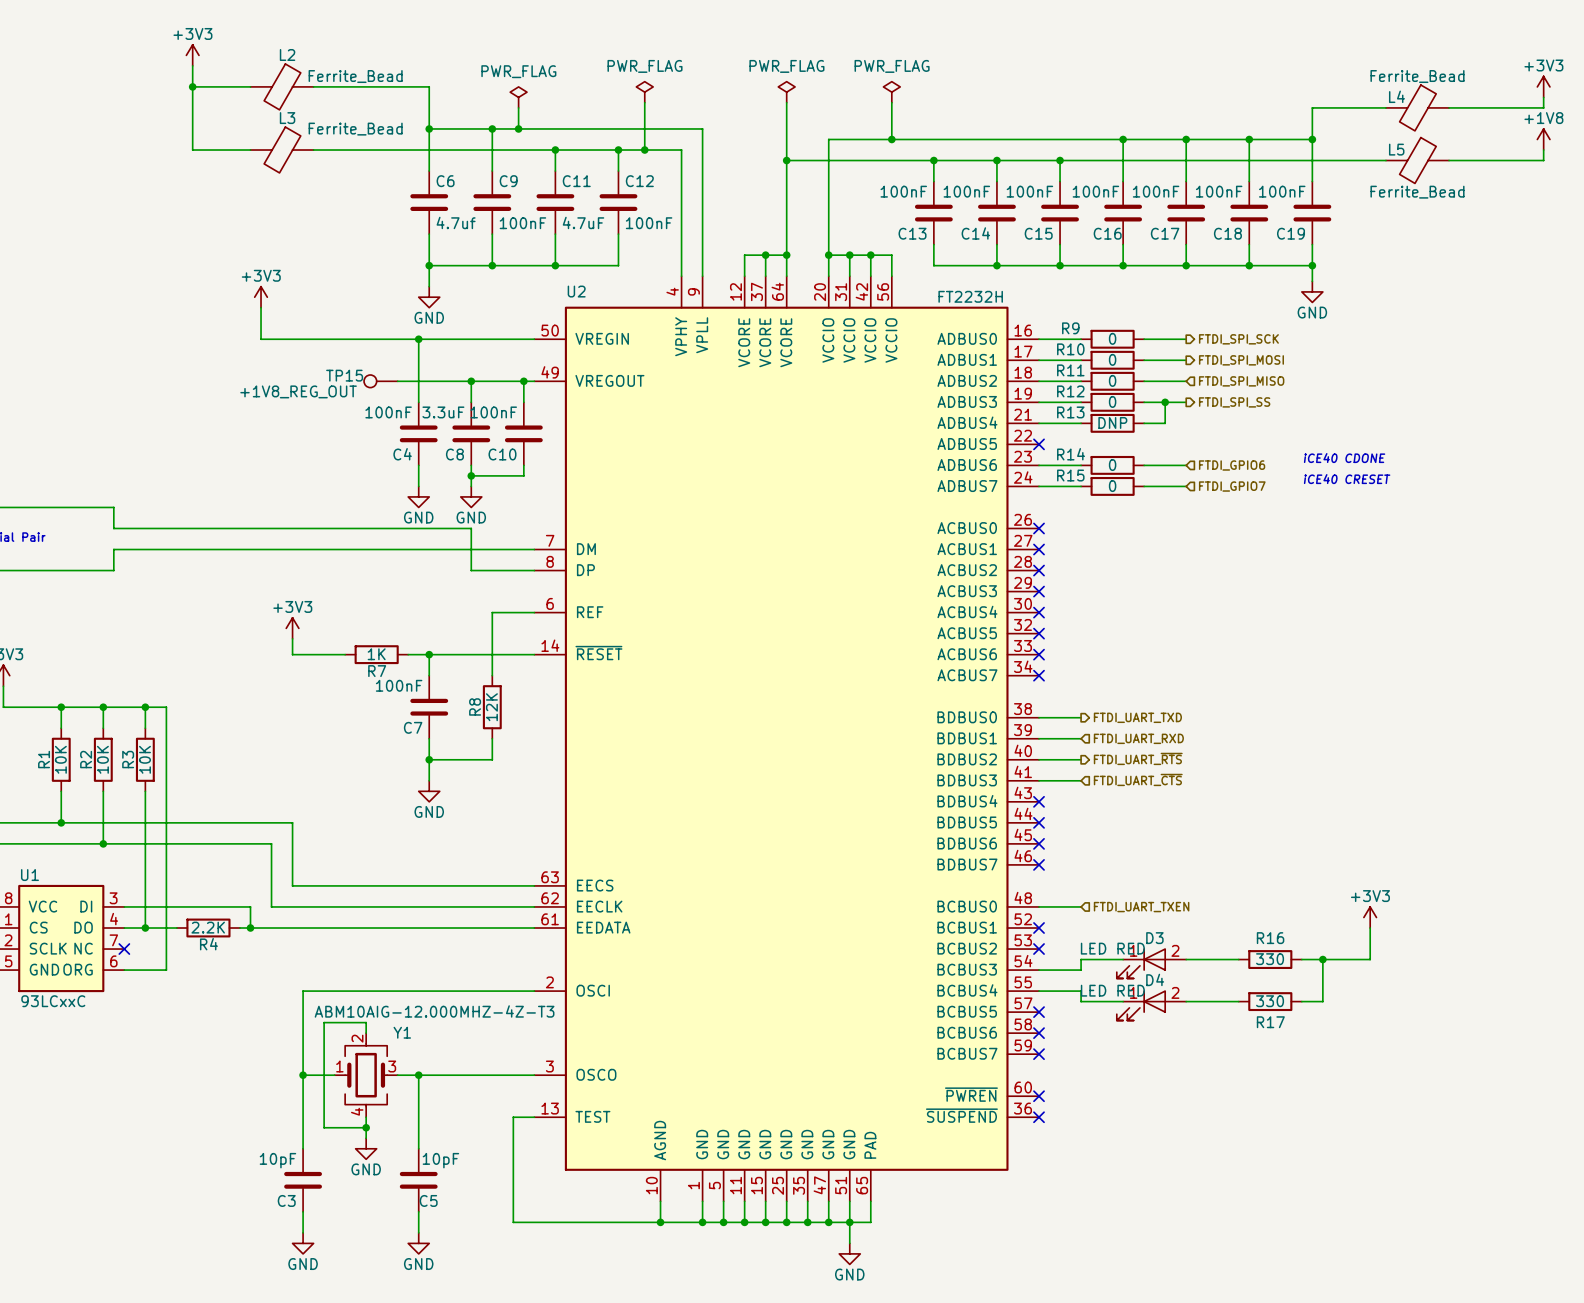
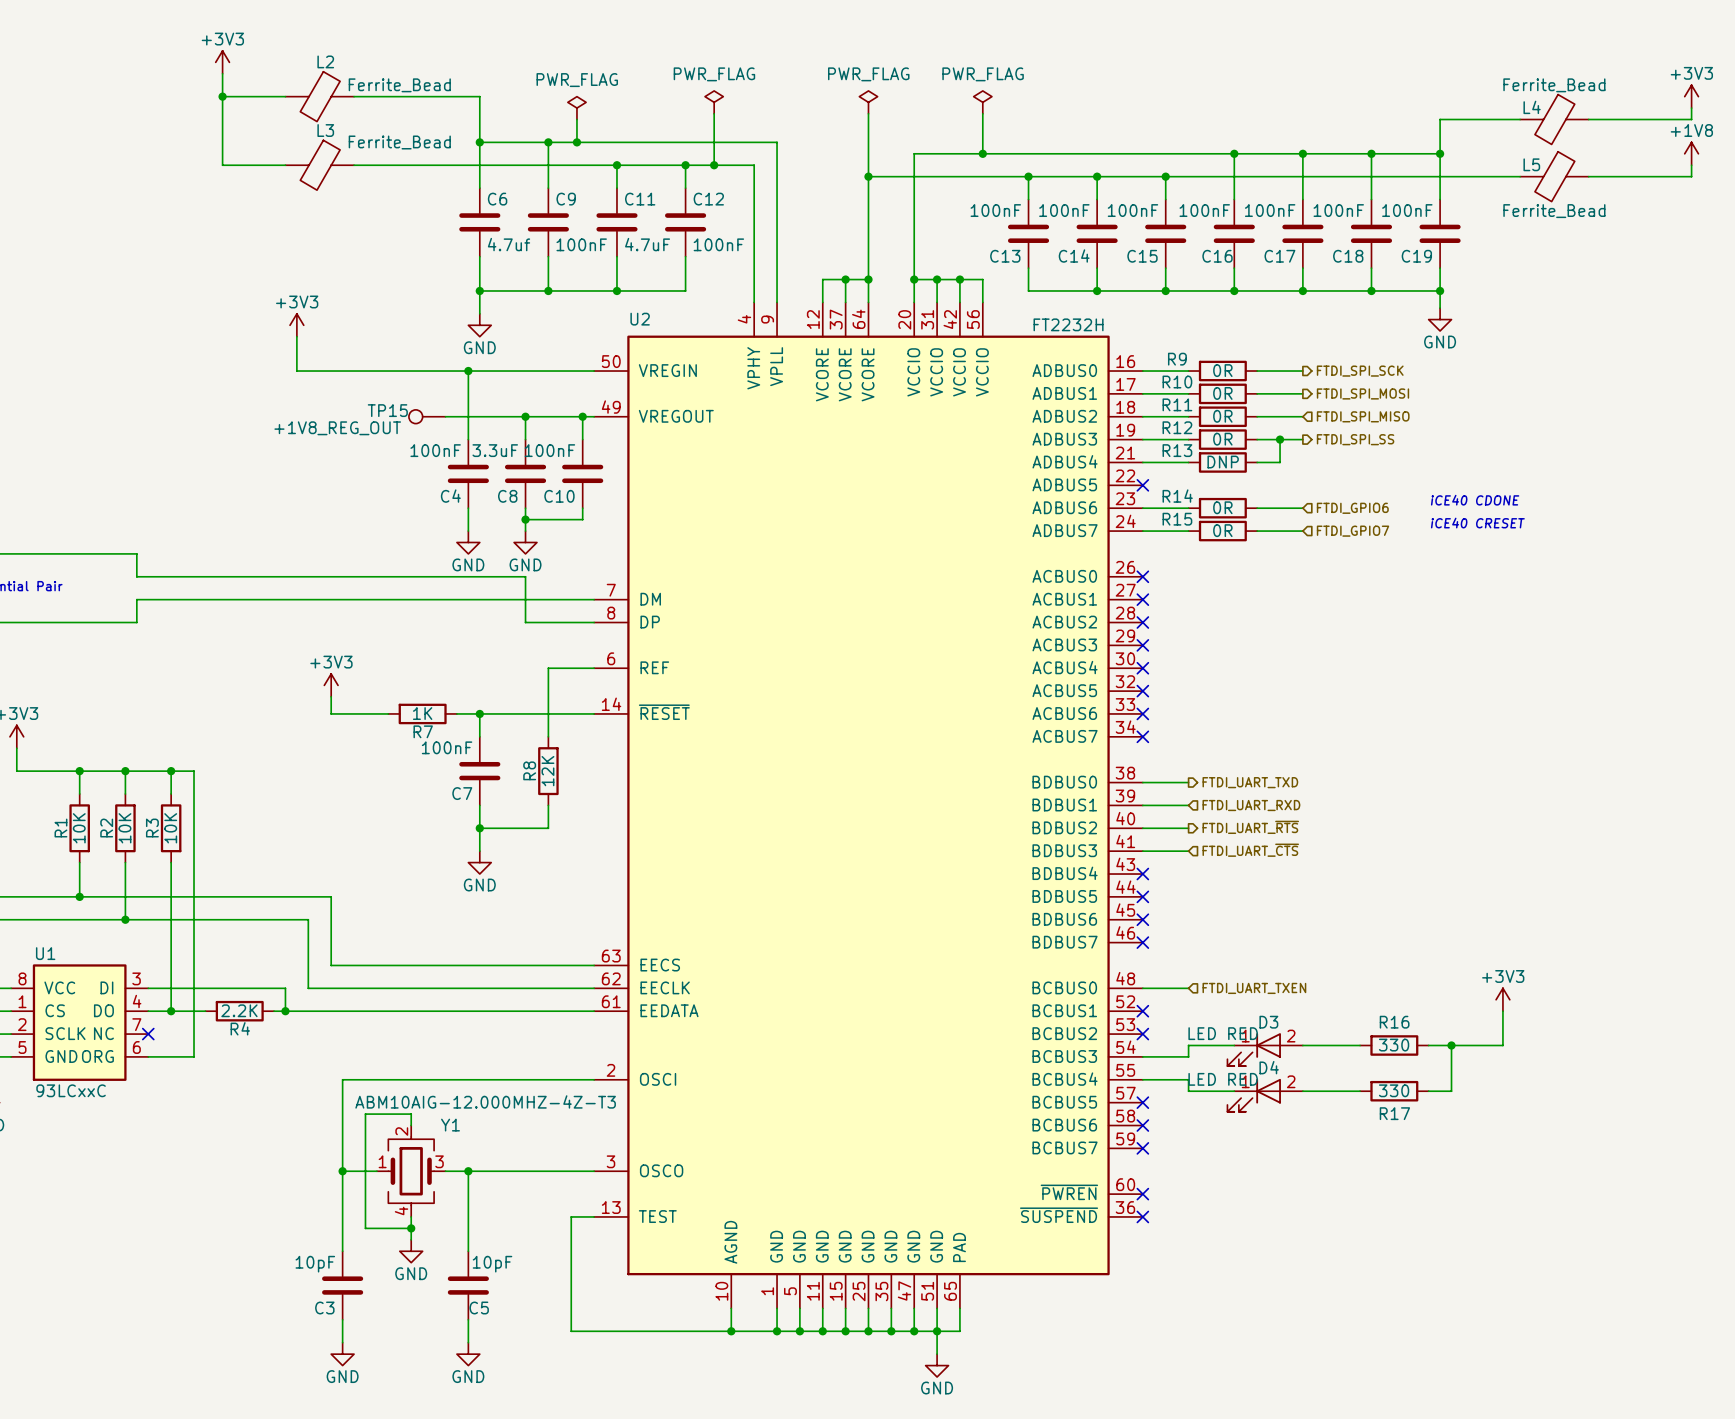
R9 value: 0 (1112, 338) -> 0R (1222, 370)
R10 value: 0 (1112, 359) -> 0R (1222, 393)
R11 value: 0 (1112, 380) -> 0R (1222, 416)
R12 value: 0 (1112, 401) -> 0R (1222, 439)
R14 value: 0 (1112, 465) -> 0R (1222, 507)
R15 value: 0 (1112, 486) -> 0R (1222, 530)

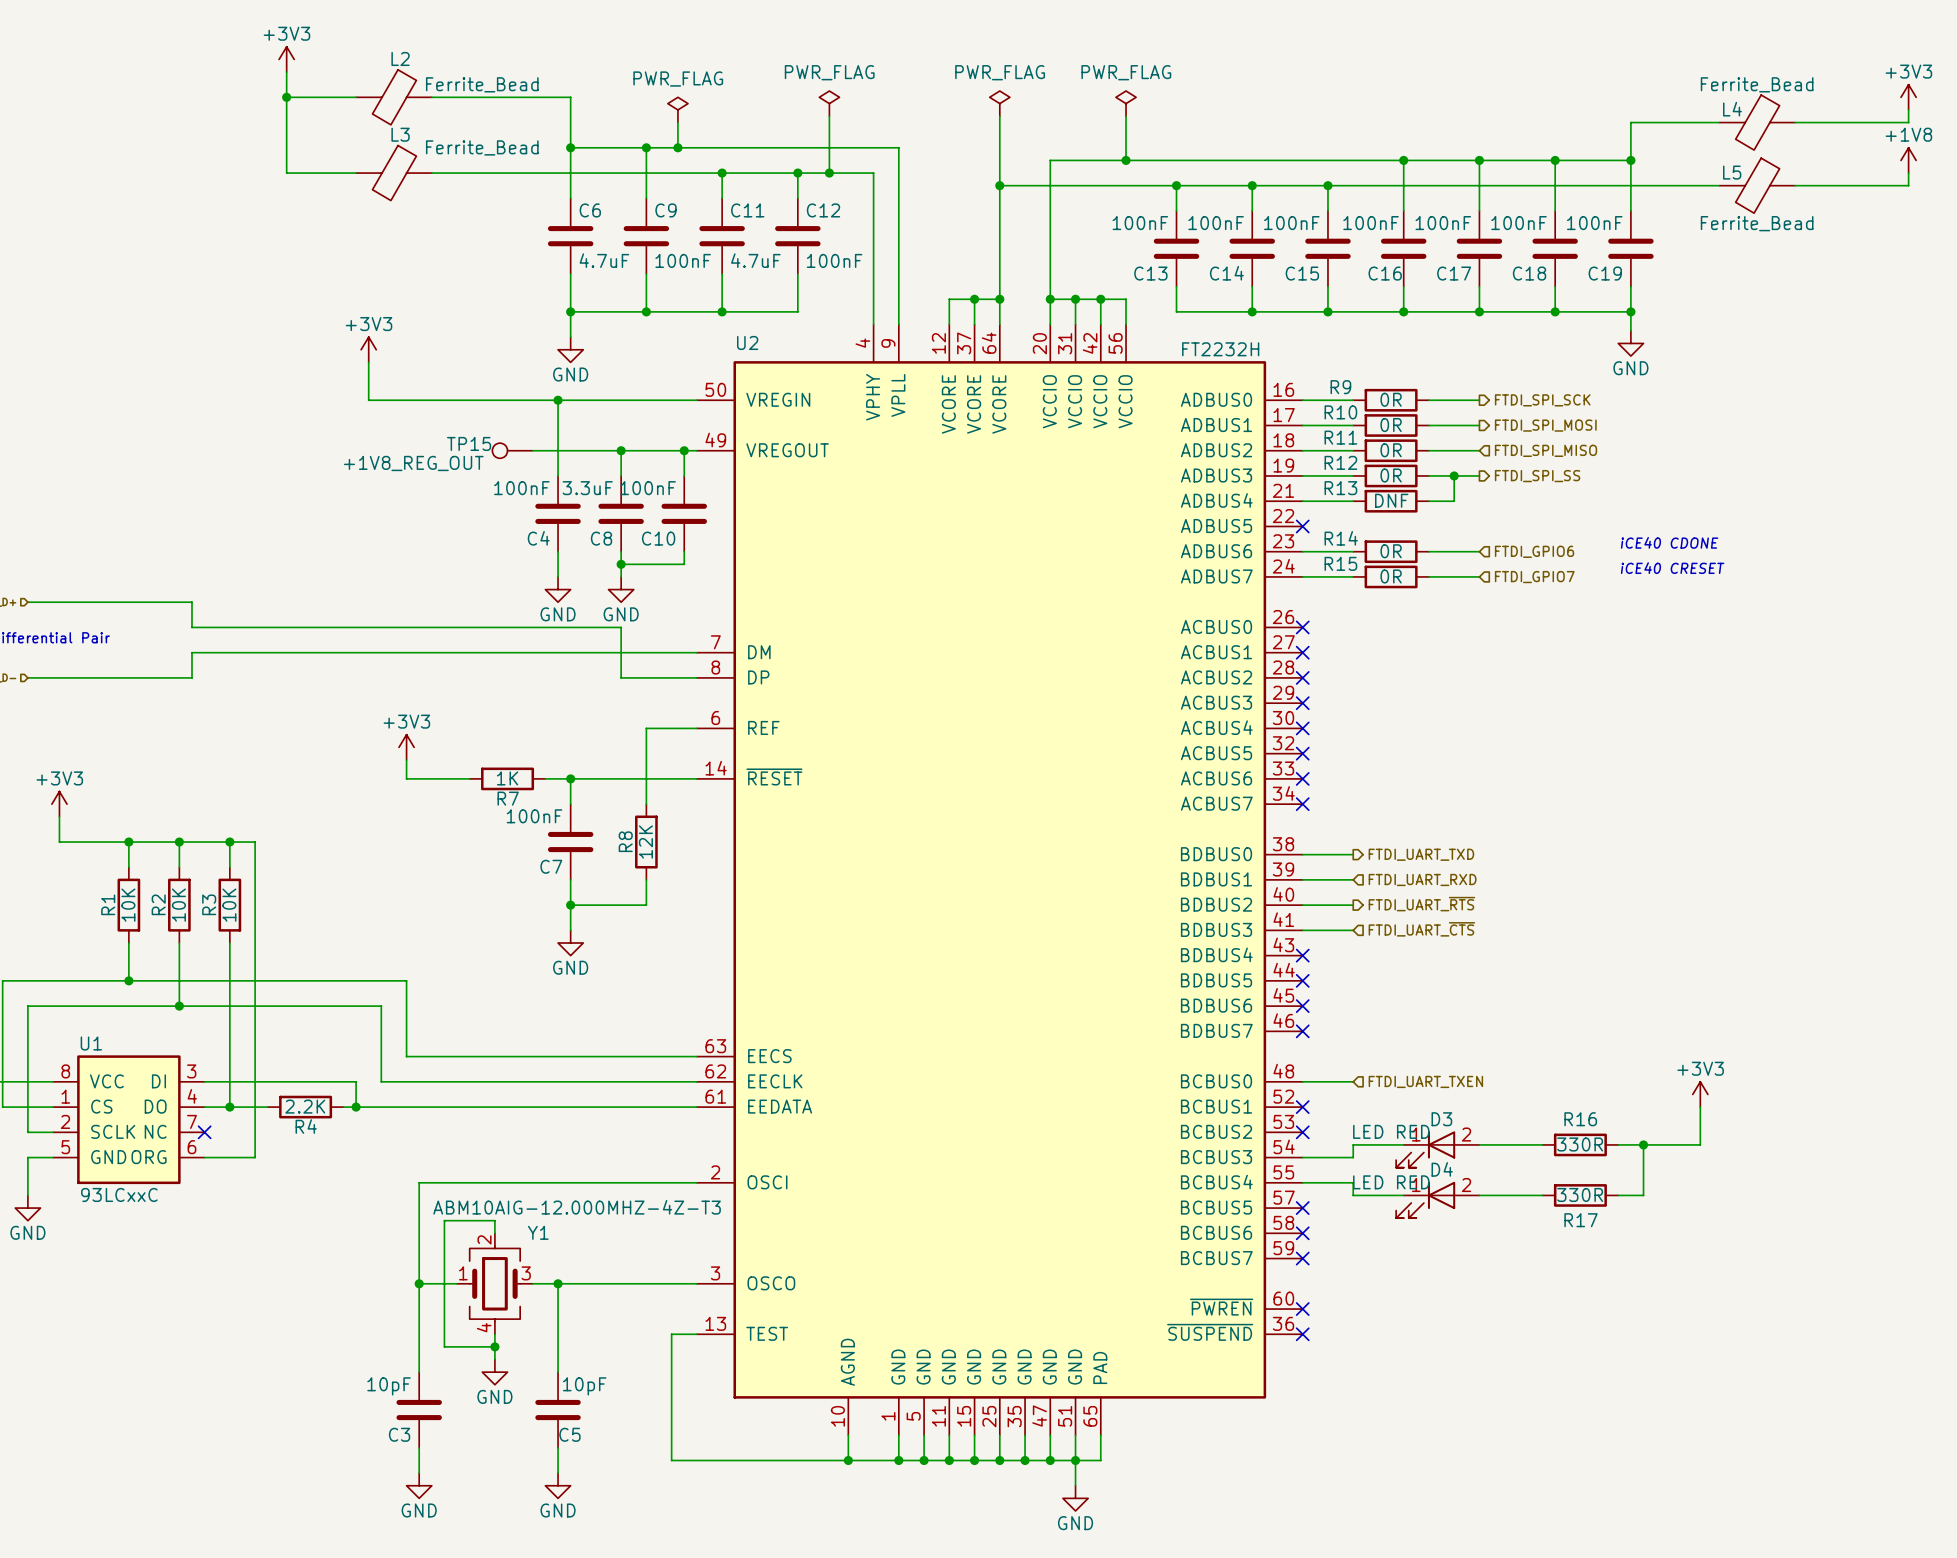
C6 value: 4.7uf (509, 244) -> 4.7uF (604, 260)
R13 value: DNP (1223, 462) -> DNF (1391, 500)
R16 value: 330 (1394, 1045) -> 330R (1580, 1144)
R17 value: 330 (1394, 1090) -> 330R (1580, 1194)

